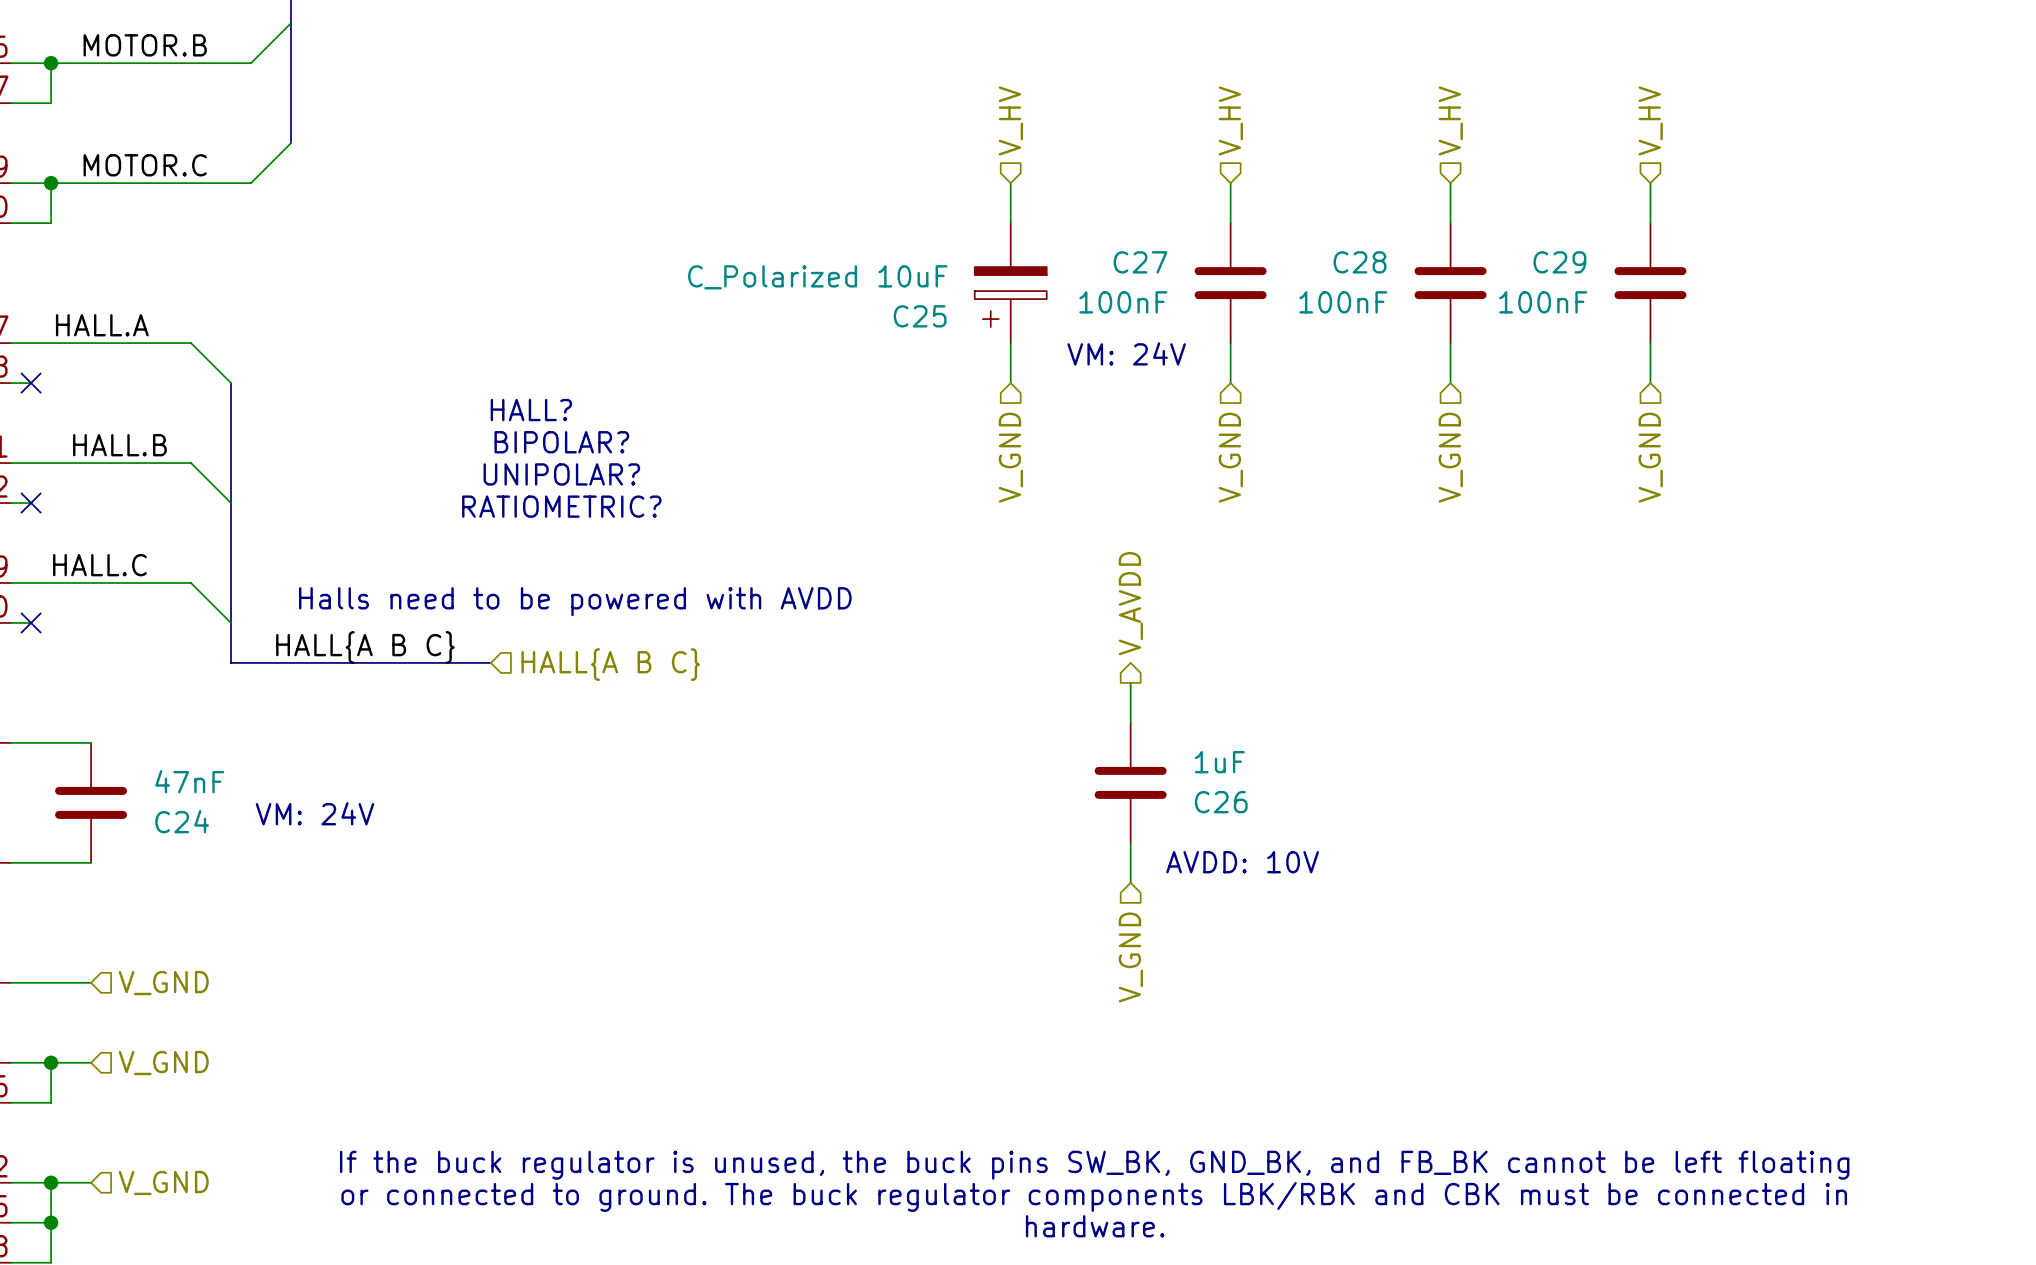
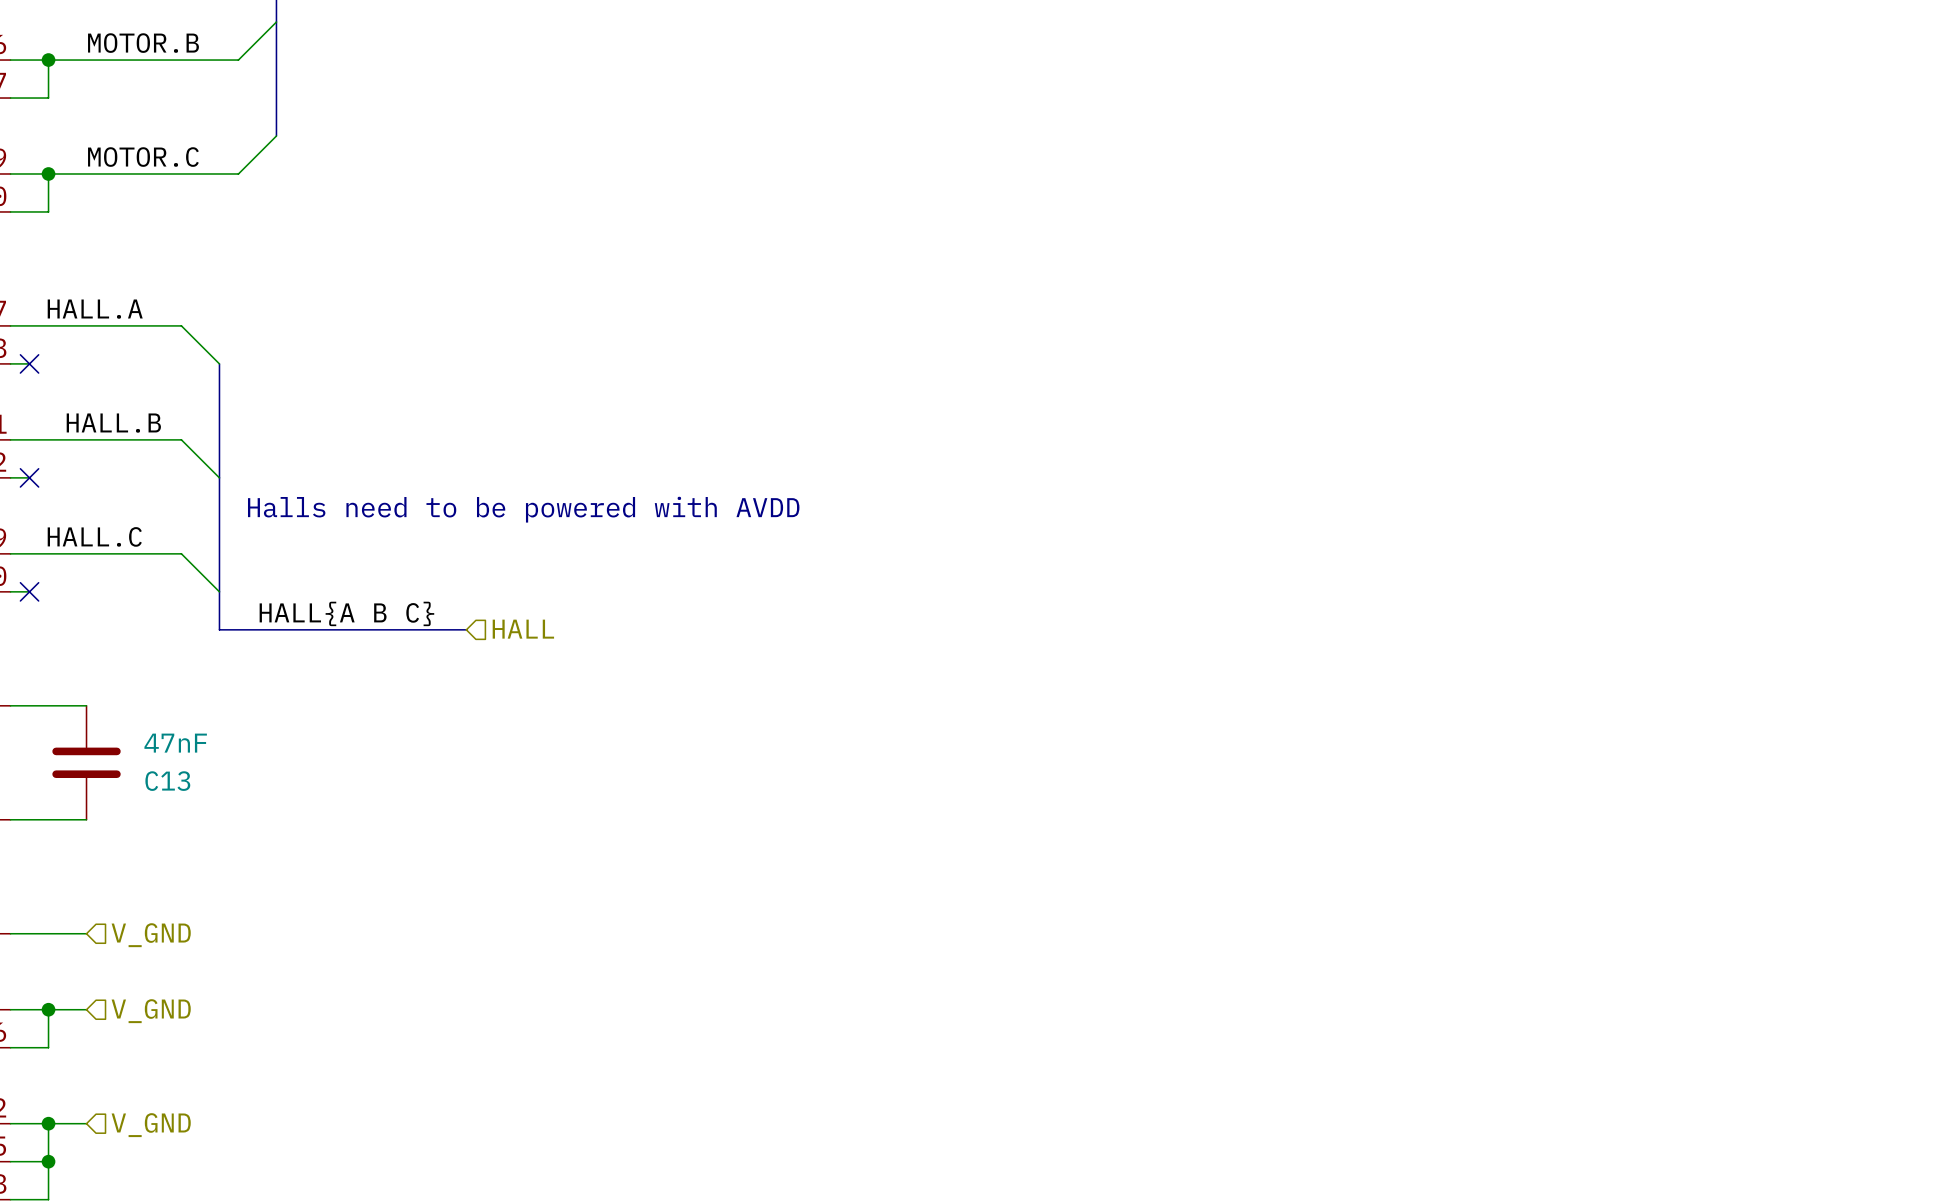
hierarchical label: V_HV (1010, 120) -> none
hierarchical label: V_HV (1230, 120) -> none
hierarchical label: V_HV (1450, 120) -> none
hierarchical label: V_HV (1650, 120) -> none
wire: (1010, 183) (1010, 223) -> none
wire: (1230, 183) (1230, 223) -> none
wire: (1450, 183) (1450, 223) -> none
wire: (1650, 183) (1650, 223) -> none
C25: C_Polarized 10uF (1010, 283) -> none
C27: 100nF (1230, 283) -> none
C28: 100nF (1450, 283) -> none
C29: 100nF (1650, 283) -> none
wire: (1010, 343) (1010, 383) -> none
wire: (1230, 343) (1230, 383) -> none
wire: (1450, 343) (1450, 383) -> none
wire: (1650, 343) (1650, 383) -> none
text: VM: 24V (1126, 353) -> none
text: HALL? (531, 410) -> none
text: BIPOLAR? (561, 442) -> none
hierarchical label: V_GND (1010, 457) -> none
hierarchical label: V_GND (1230, 457) -> none
hierarchical label: V_GND (1450, 457) -> none
hierarchical label: V_GND (1650, 457) -> none
text: UNIPOLAR? (561, 474) -> none
text: RATIOMETRIC? (561, 506) -> none
text position: Halls need to be powered with AVDD (575, 601) -> Halls need to be powered with AVDD (523, 509)
hierarchical label: V_AVDD (1130, 603) -> none
hierarchical label: HALL{A B C} (610, 664) -> HALL (523, 629)
wire: (1130, 682) (1130, 722) -> none
C26: 1uF (1130, 782) -> none
text: VM: 24V (314, 813) -> none
C24 name: C24 (182, 821) -> C13 (167, 781)
wire: (1130, 842) (1130, 882) -> none
text: AVDD: 10V (1242, 862) -> none
hierarchical label: V_GND (1130, 957) -> none
text: If the buck regulator is unused, the buck pins SW_BK, GND_BK, and FB_BK cannot be left floating (1094, 1165) -> none
text: or connected to ground. The buck regulator components LBK/RBK and CBK must be connected in (1094, 1196) -> none
text: hardware. (1095, 1226) -> none

